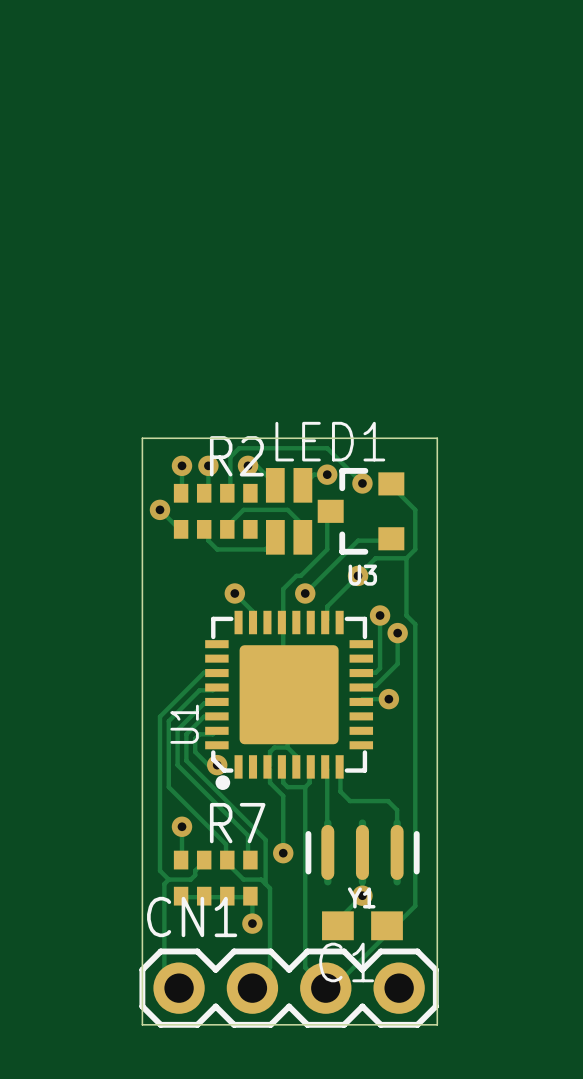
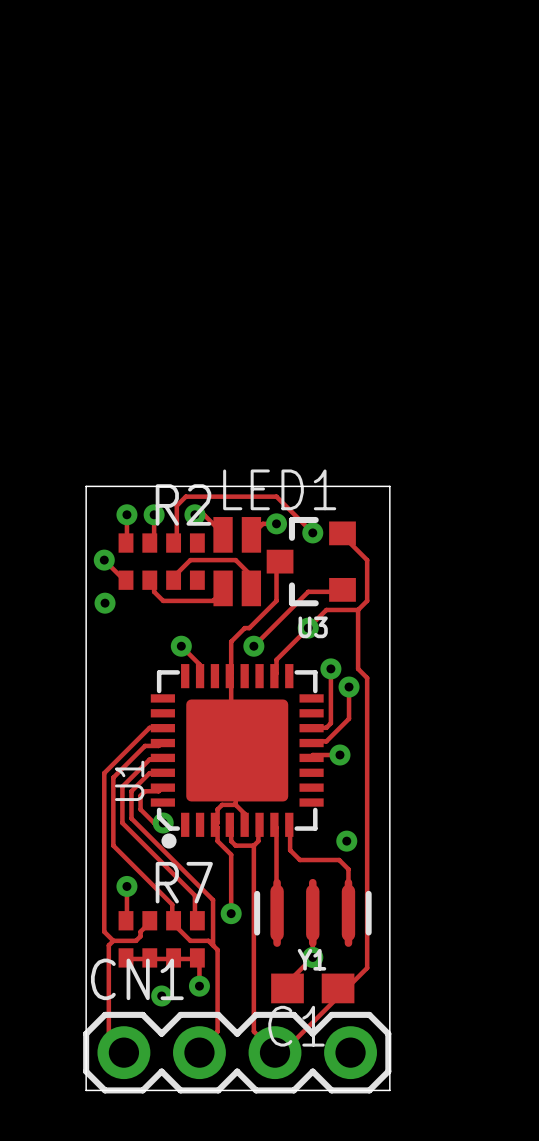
via: none -> (105, 603)
via: none -> (346, 841)
via: none -> (161, 995)

